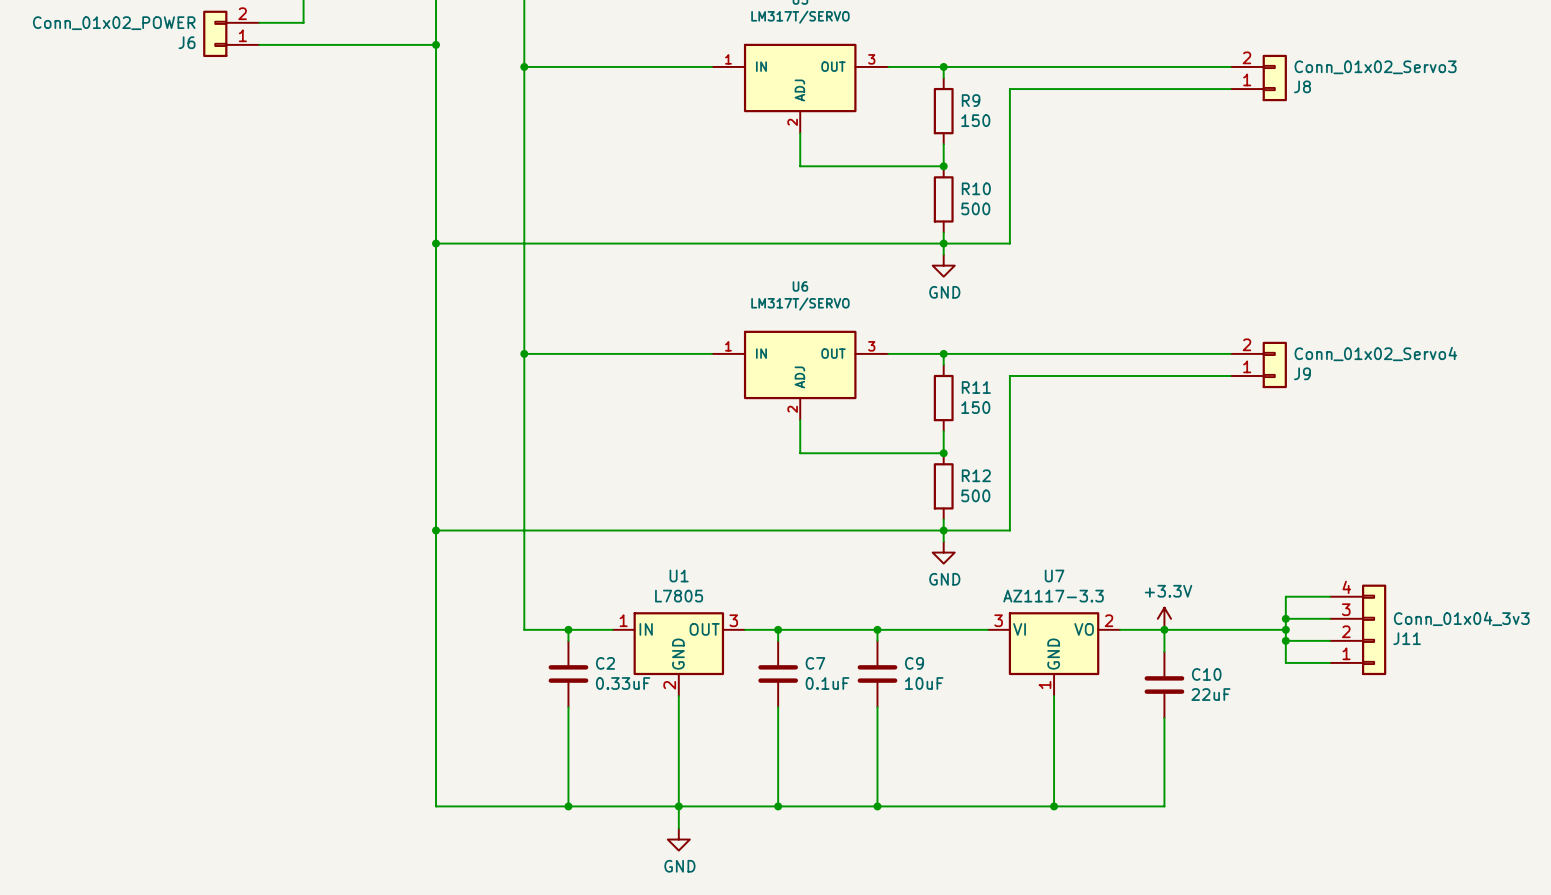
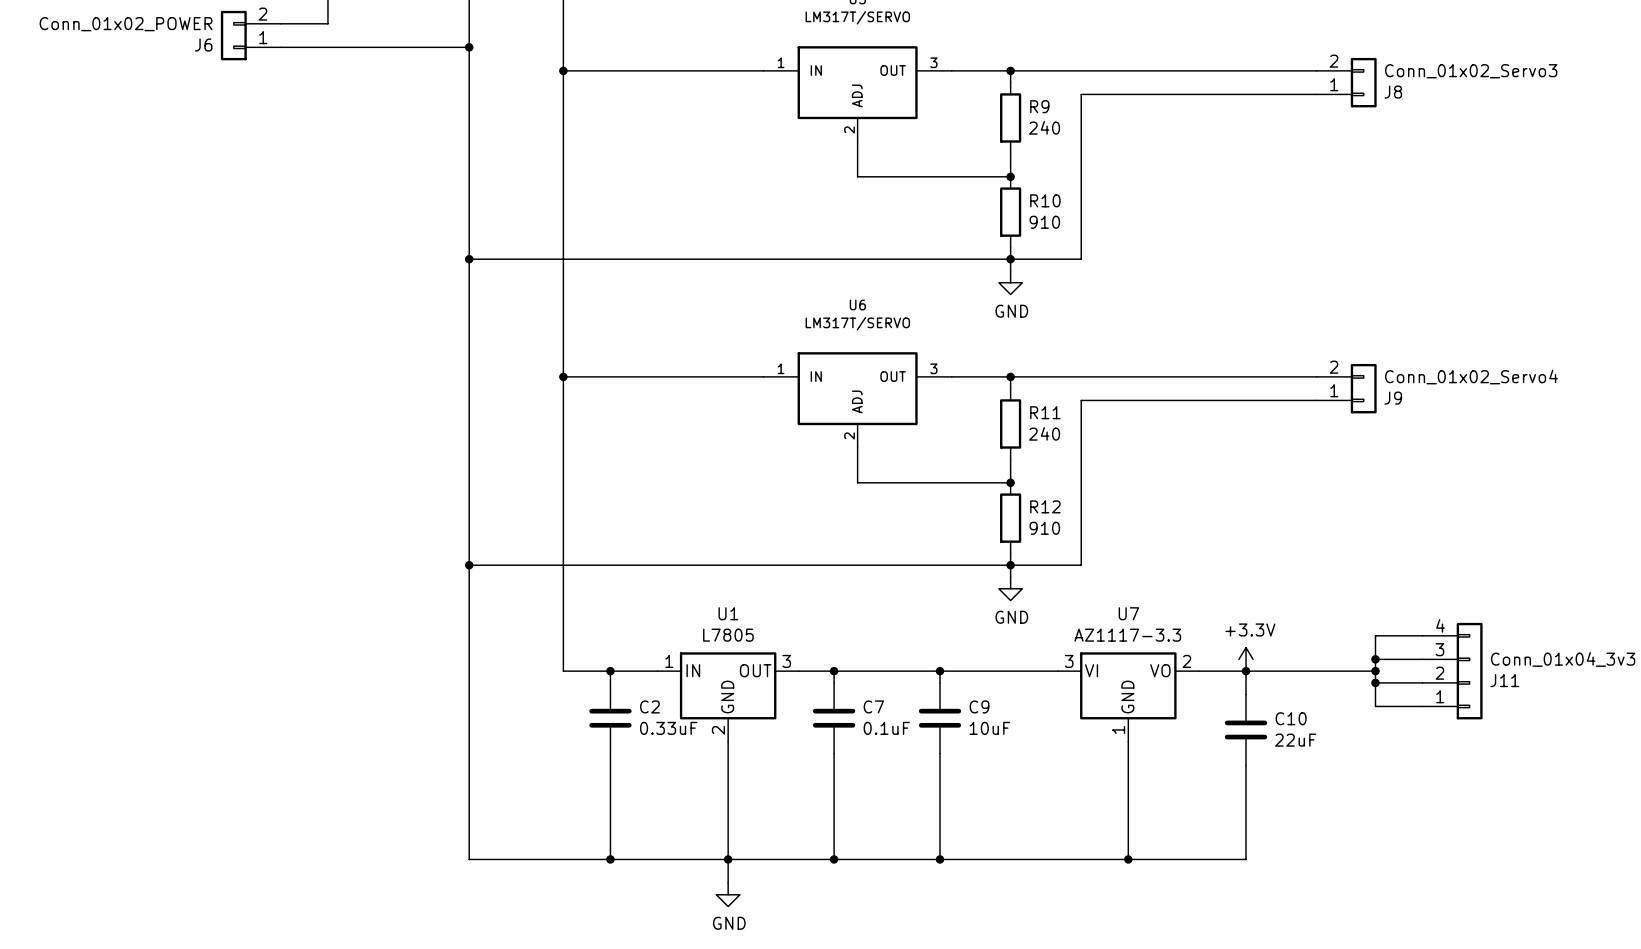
R9 value: 150 (975, 120) -> 240 (1044, 127)
R10 value: 500 (975, 208) -> 910 (1044, 222)
R11 value: 150 (975, 407) -> 240 (1044, 433)
R12 value: 500 (975, 495) -> 910 (1044, 528)

